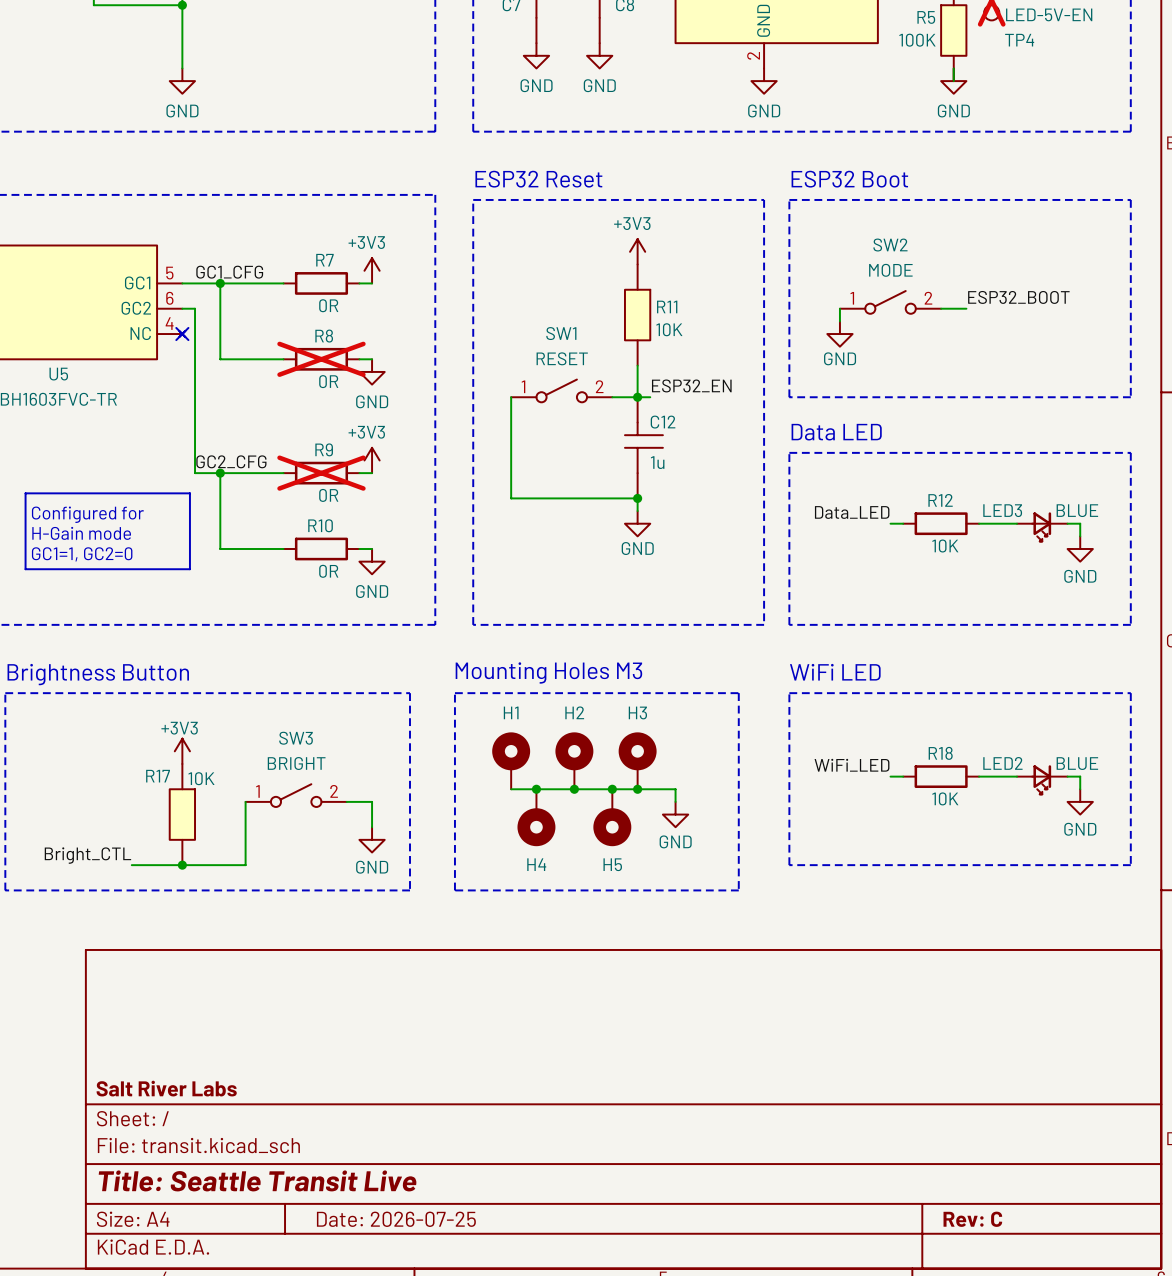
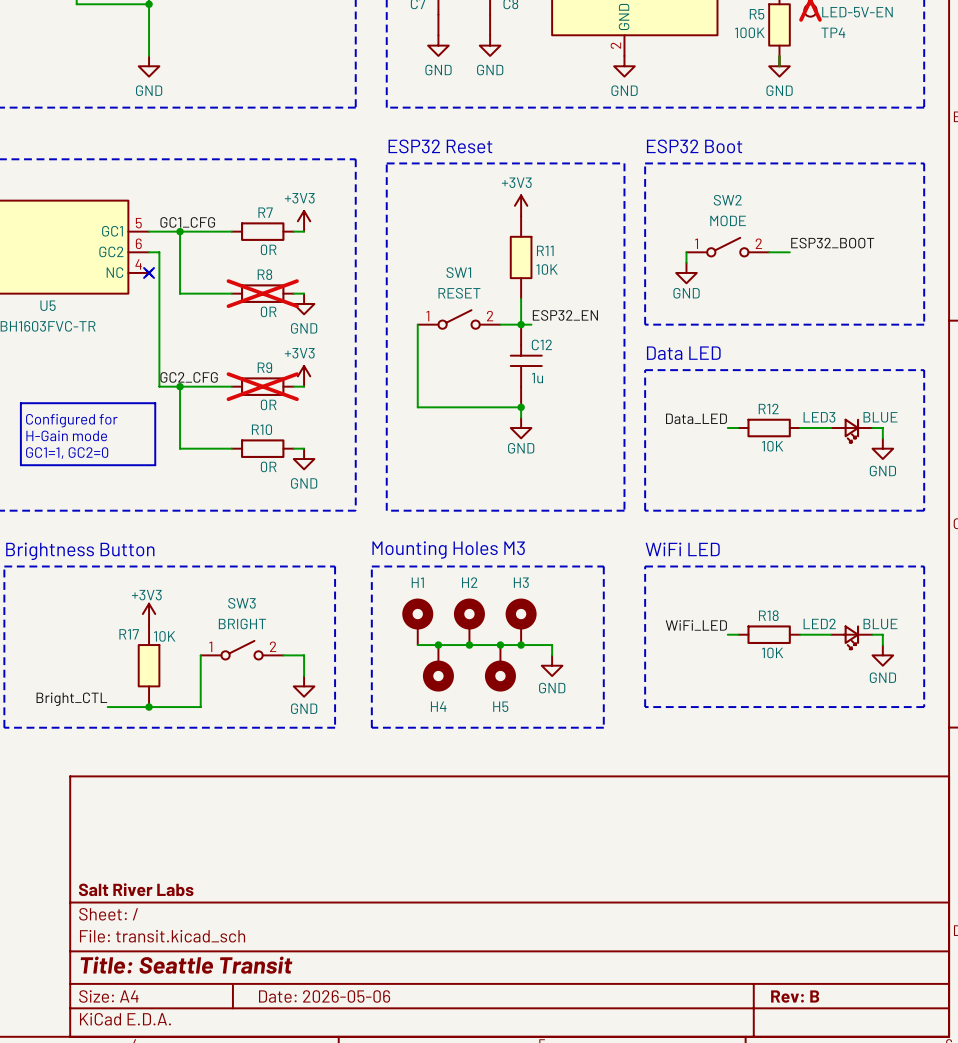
title block: Title: Seattle Transit Live (257, 1180) -> Title: Seattle Transit (186, 965)
title block: Date: 2026-07-25 (396, 1219) -> Date: 2026-05-06 (324, 996)
title block: Rev: C (972, 1219) -> Rev: B (795, 996)

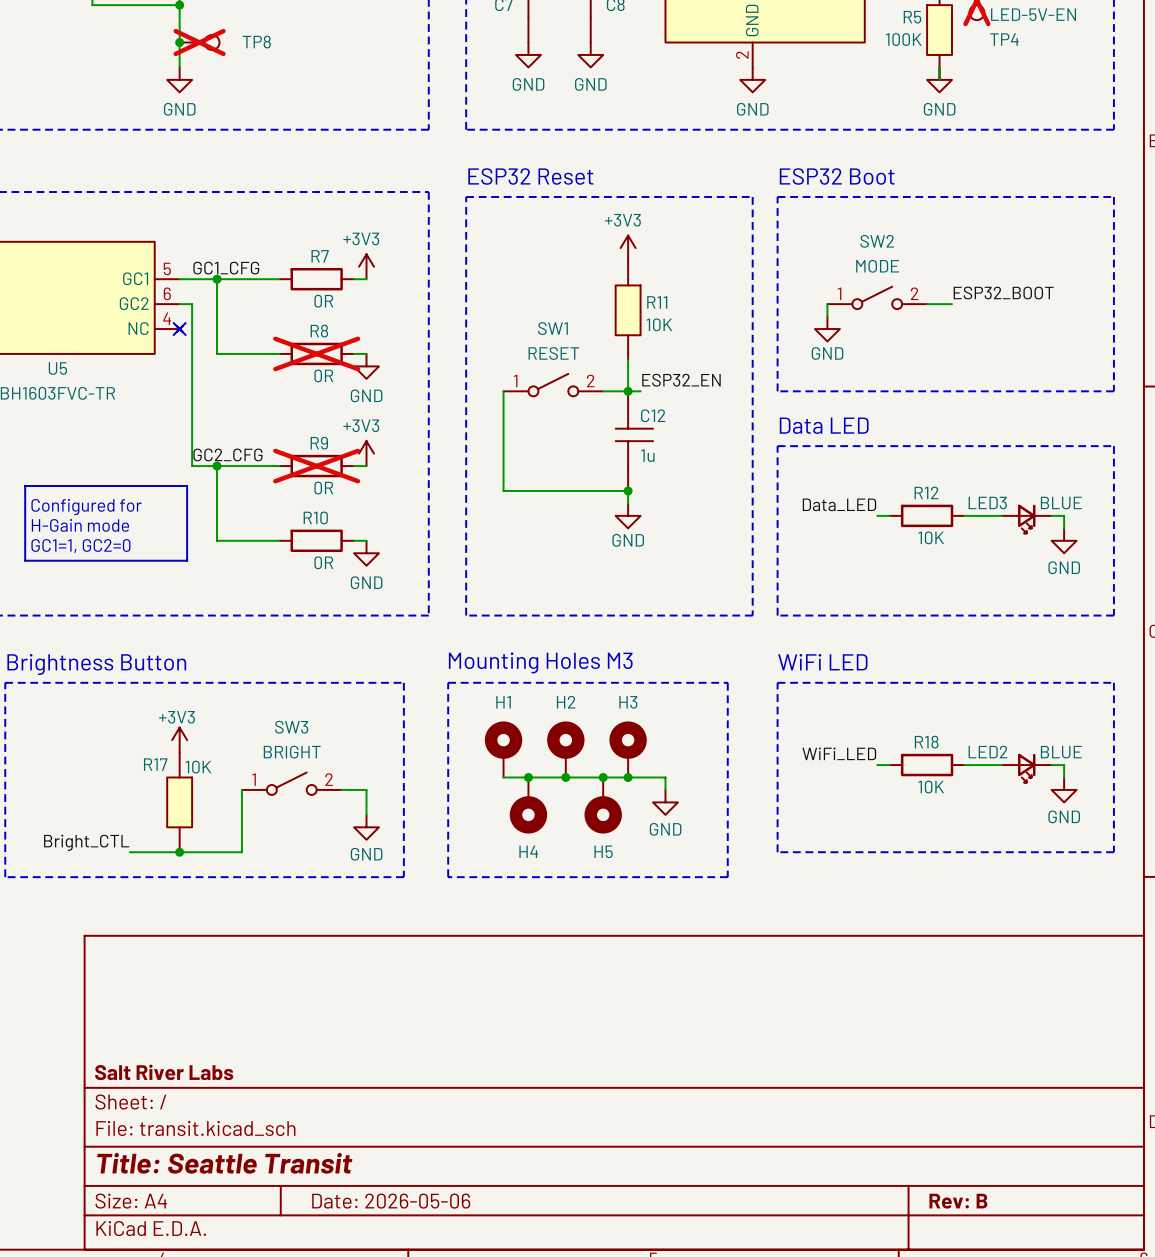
junction: none -> (179, 42)
TP8: none -> (199, 42)

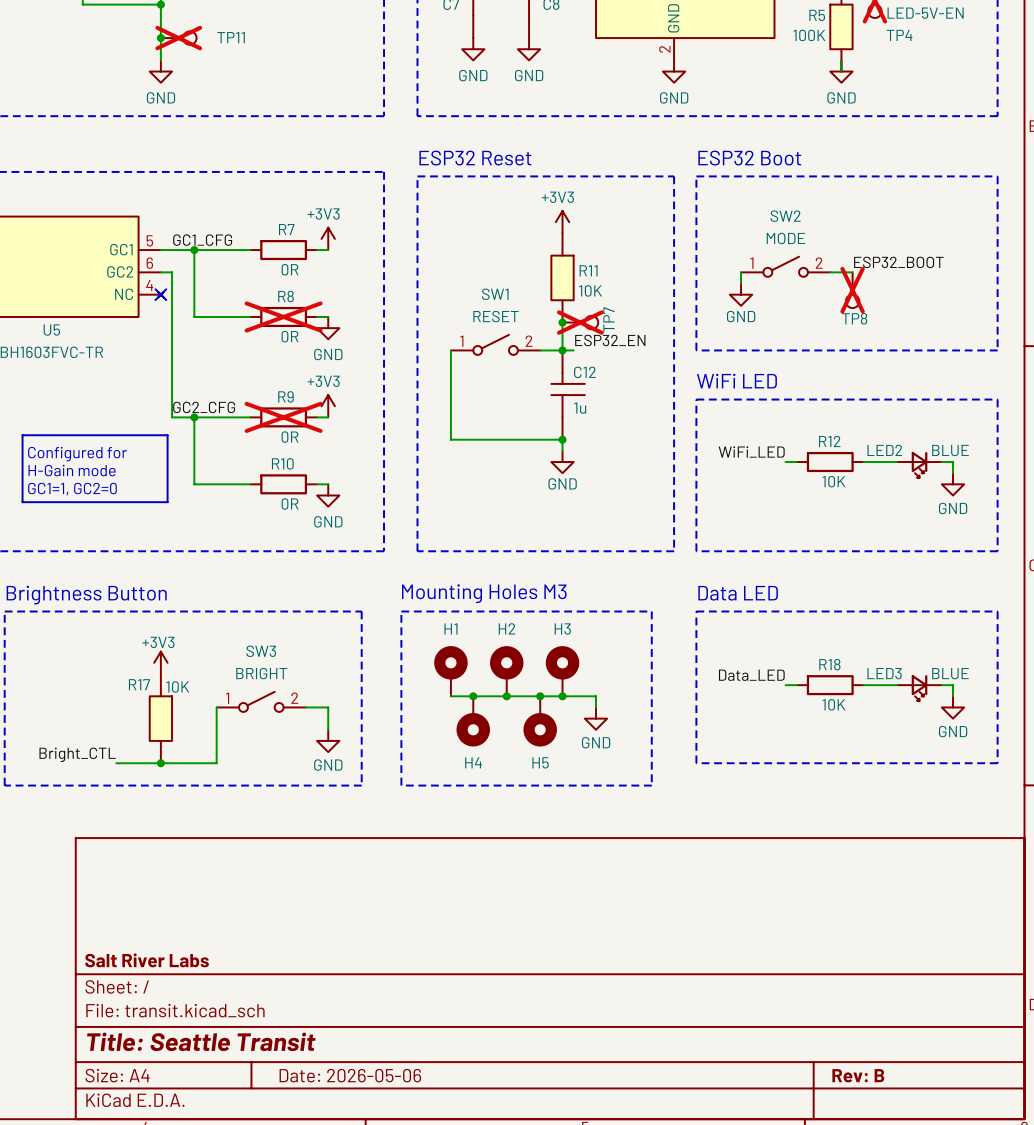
TP8 name: TP8 (256, 42) -> TP11 (231, 37)
TP8: none -> (852, 290)
junction: none -> (562, 322)
TP7: none -> (580, 322)
text: Data LED (824, 425) -> WiFi LED (736, 381)
LED3 name position: LED3 (987, 503) -> LED3 (884, 673)
label: Data_LED (839, 504) -> WiFi_LED (751, 451)
text: WiFi LED (822, 662) -> Data LED (738, 593)
LED2 name position: LED2 (987, 752) -> LED2 (884, 450)
label: WiFi_LED (839, 753) -> Data_LED (751, 675)

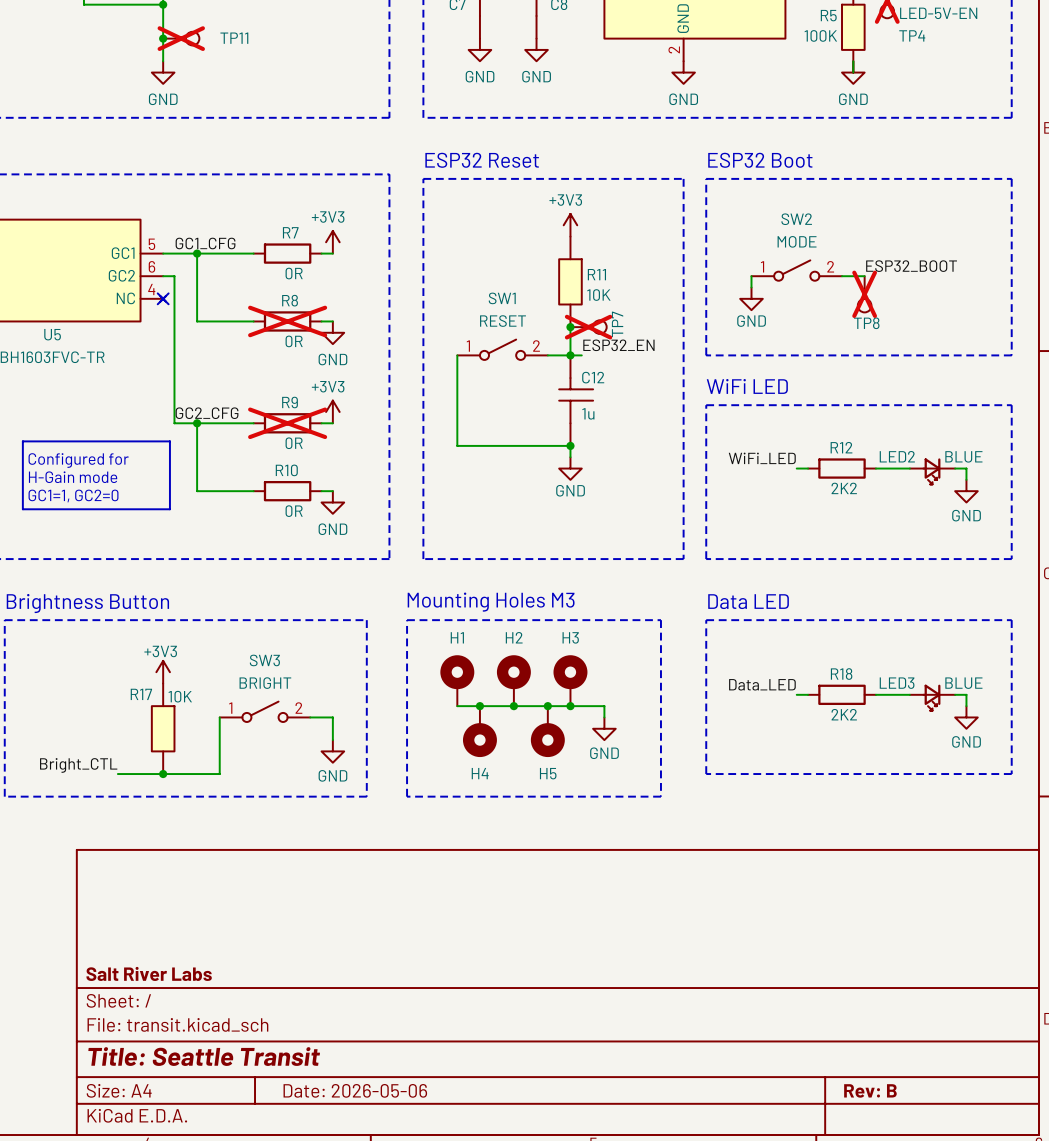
R12 value: 10K (833, 481) -> 2K2 (844, 488)
R18 value: 10K (833, 704) -> 2K2 (844, 714)

